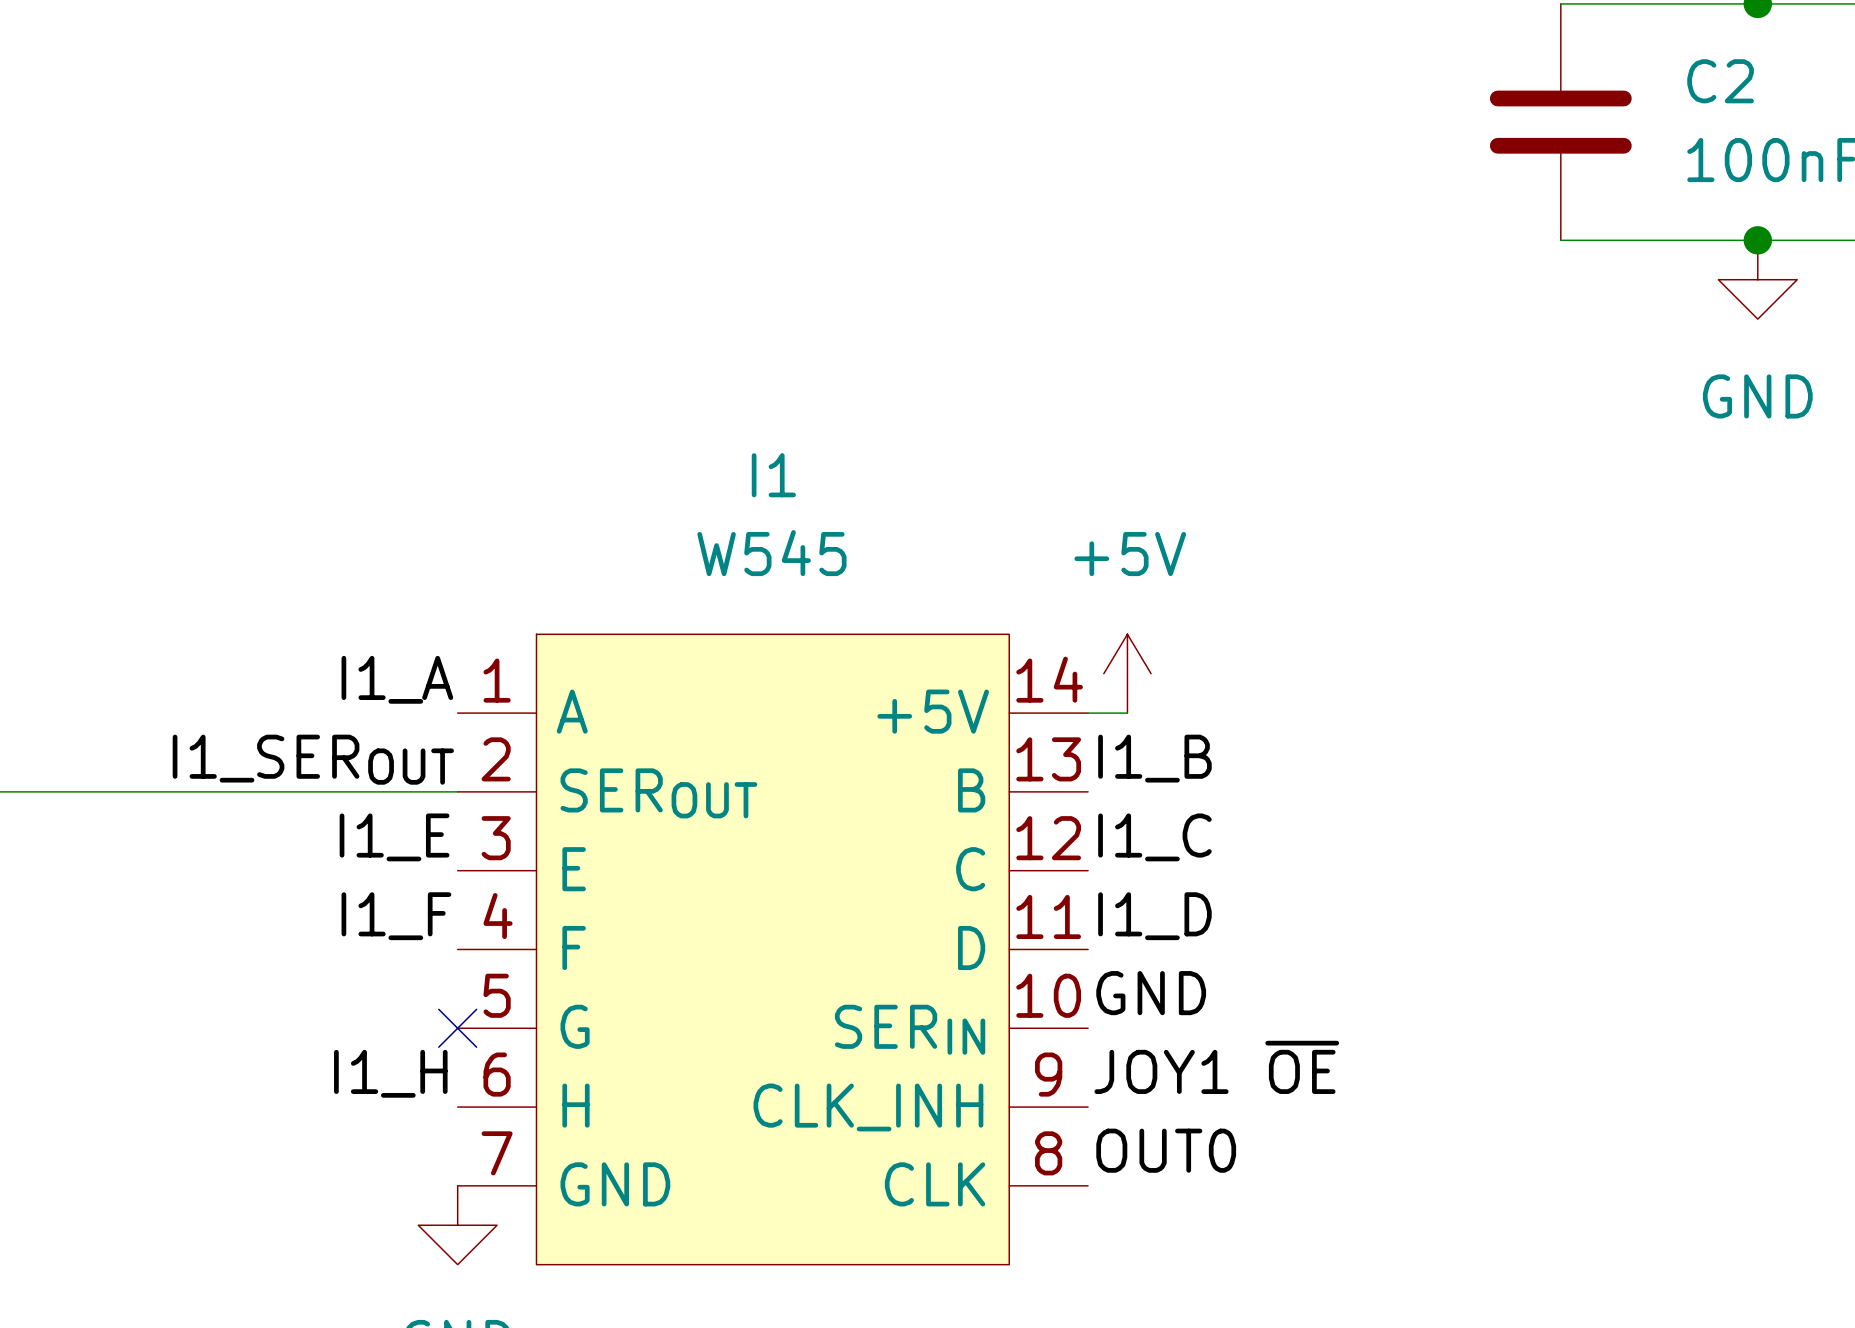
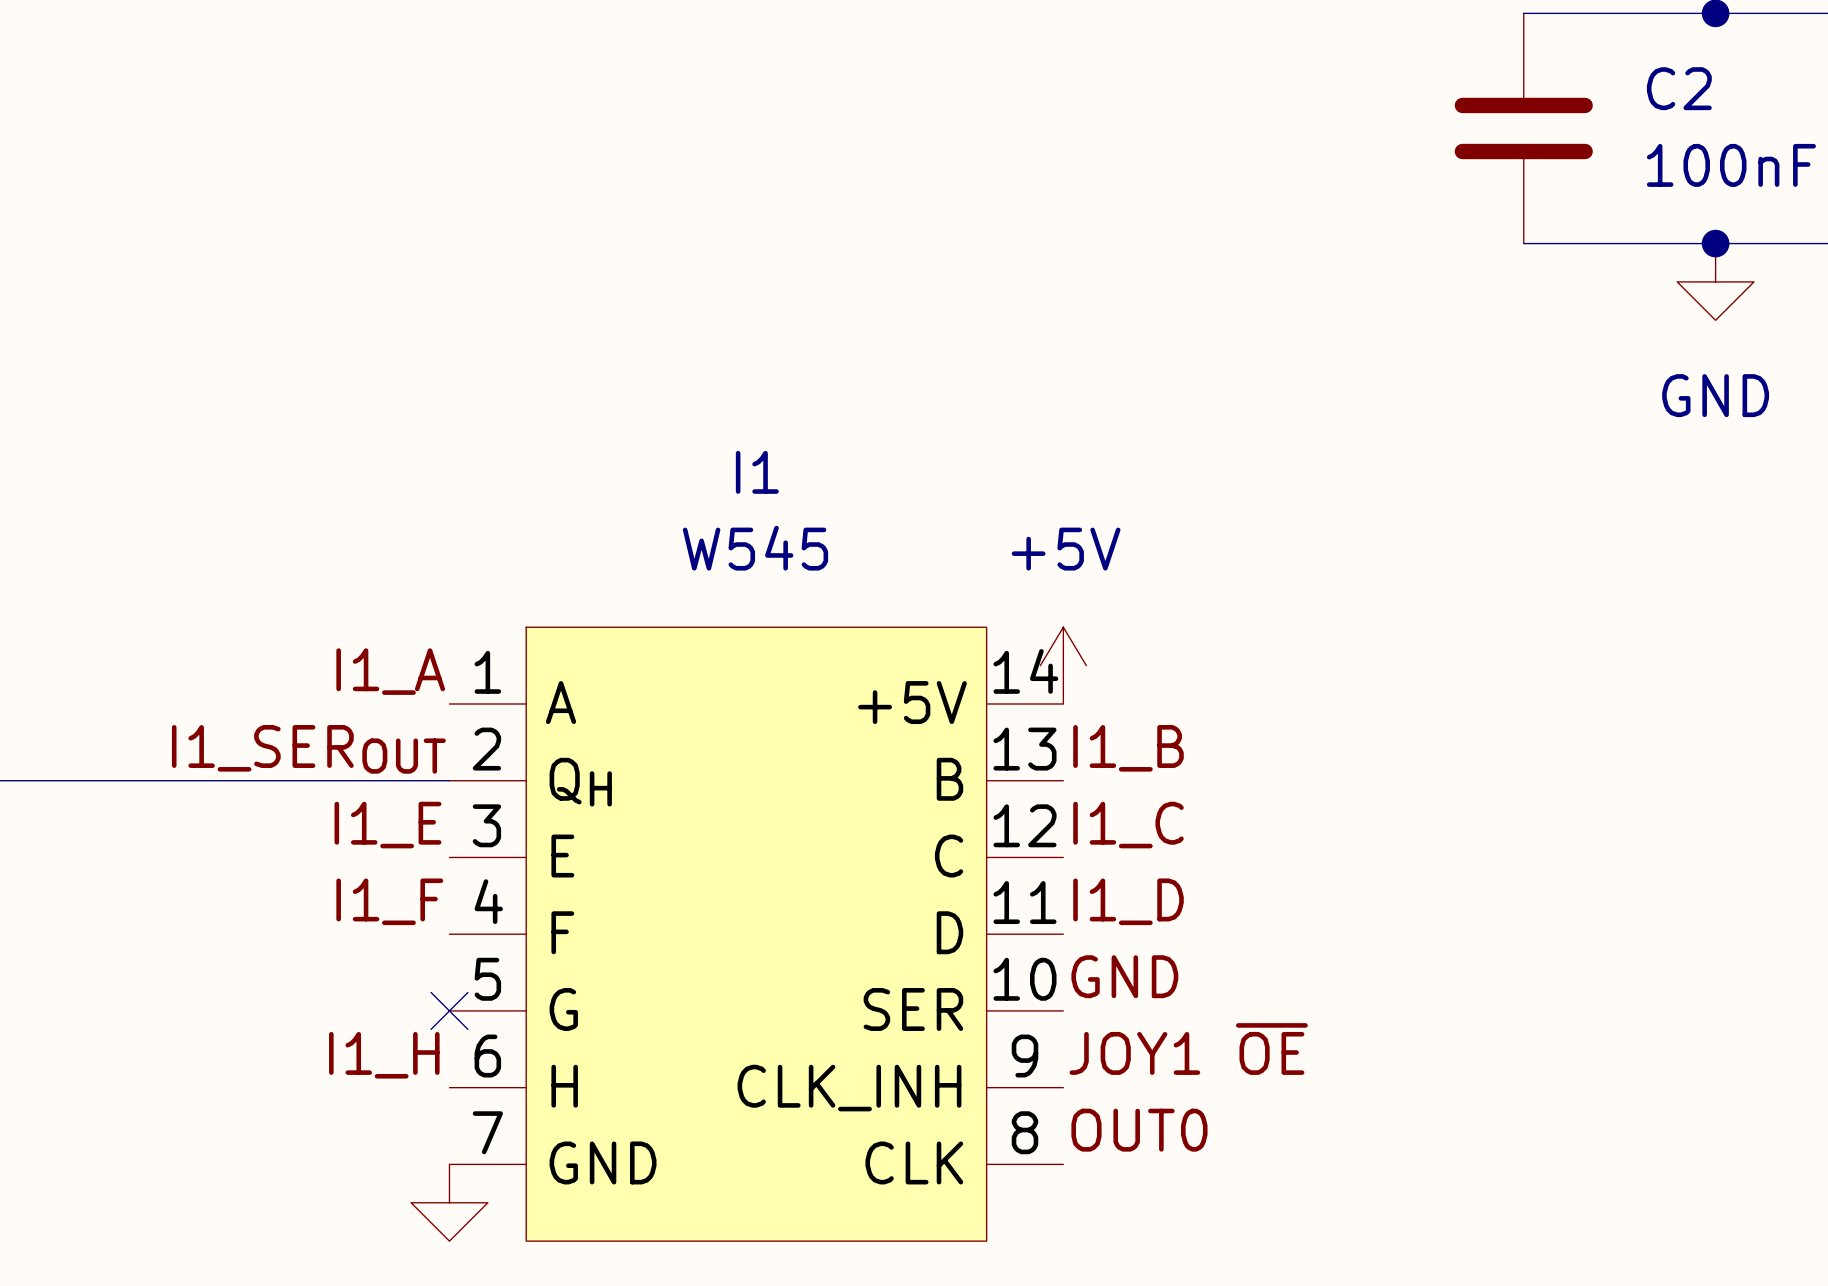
power symbol position: +5V (1127, 673) -> +5V (1063, 665)
wire: (1088, 713) (1127, 713) -> none
I1 pin name: SEROUT (658, 793) -> QH (580, 782)
I1 pin name: SERIN (910, 1029) -> SER (913, 1009)

